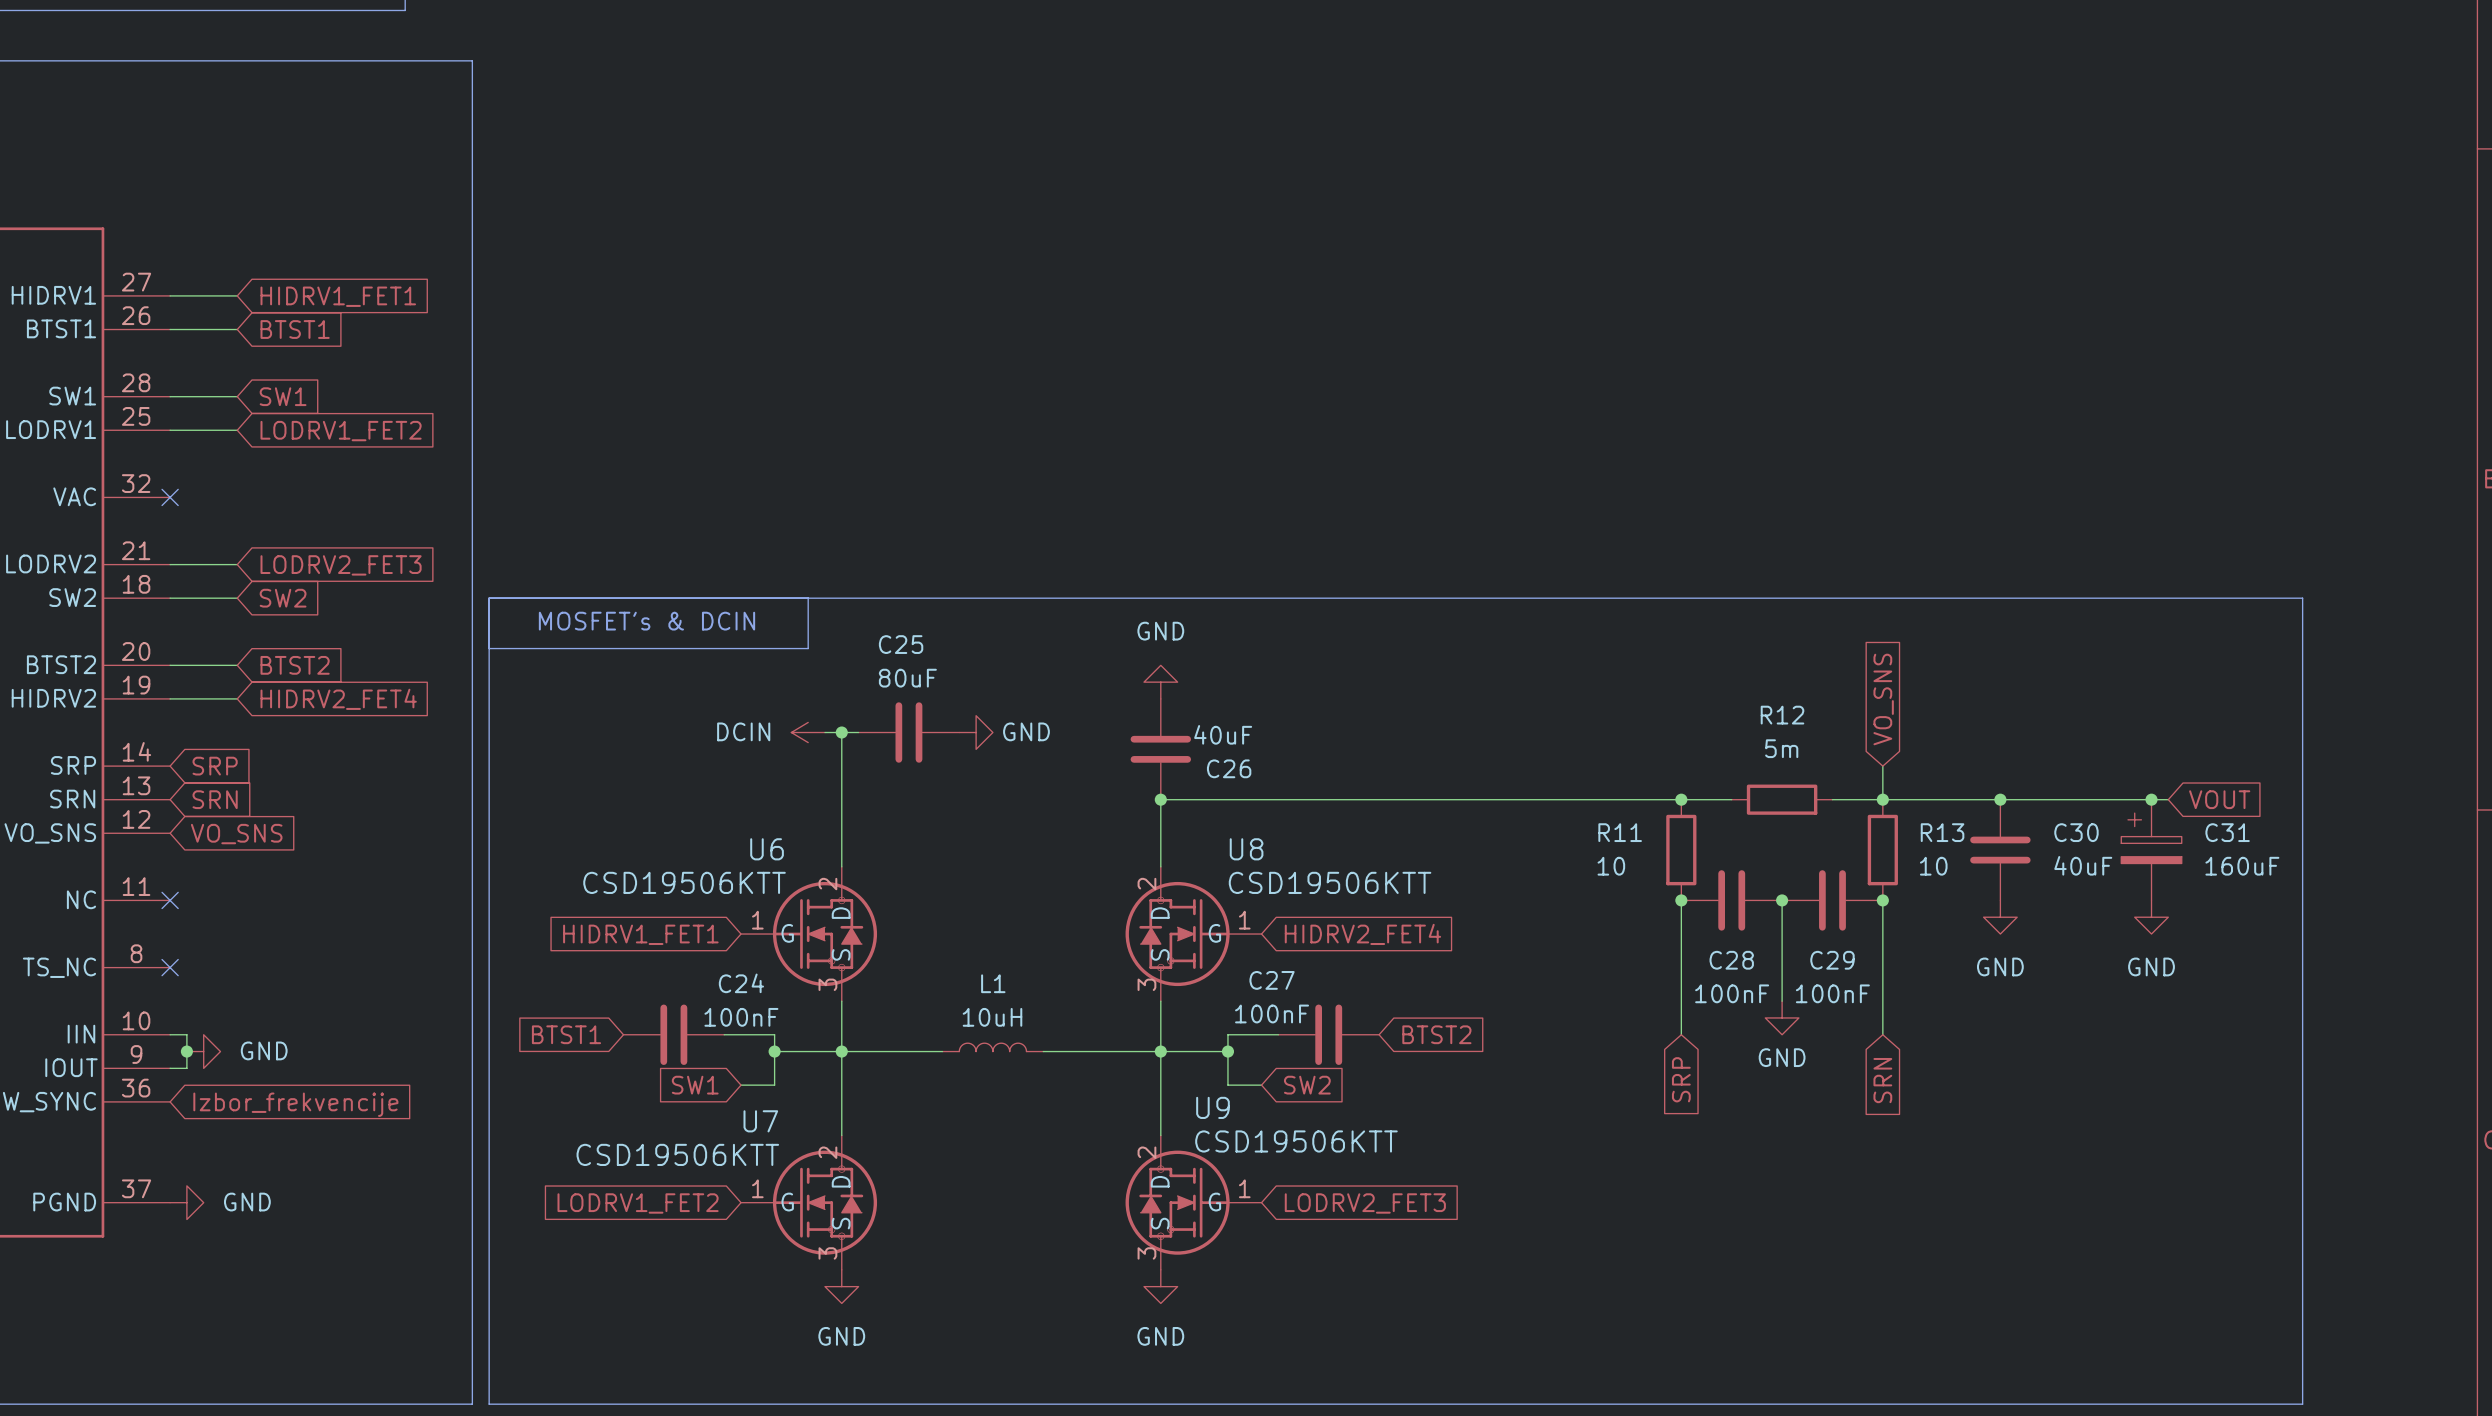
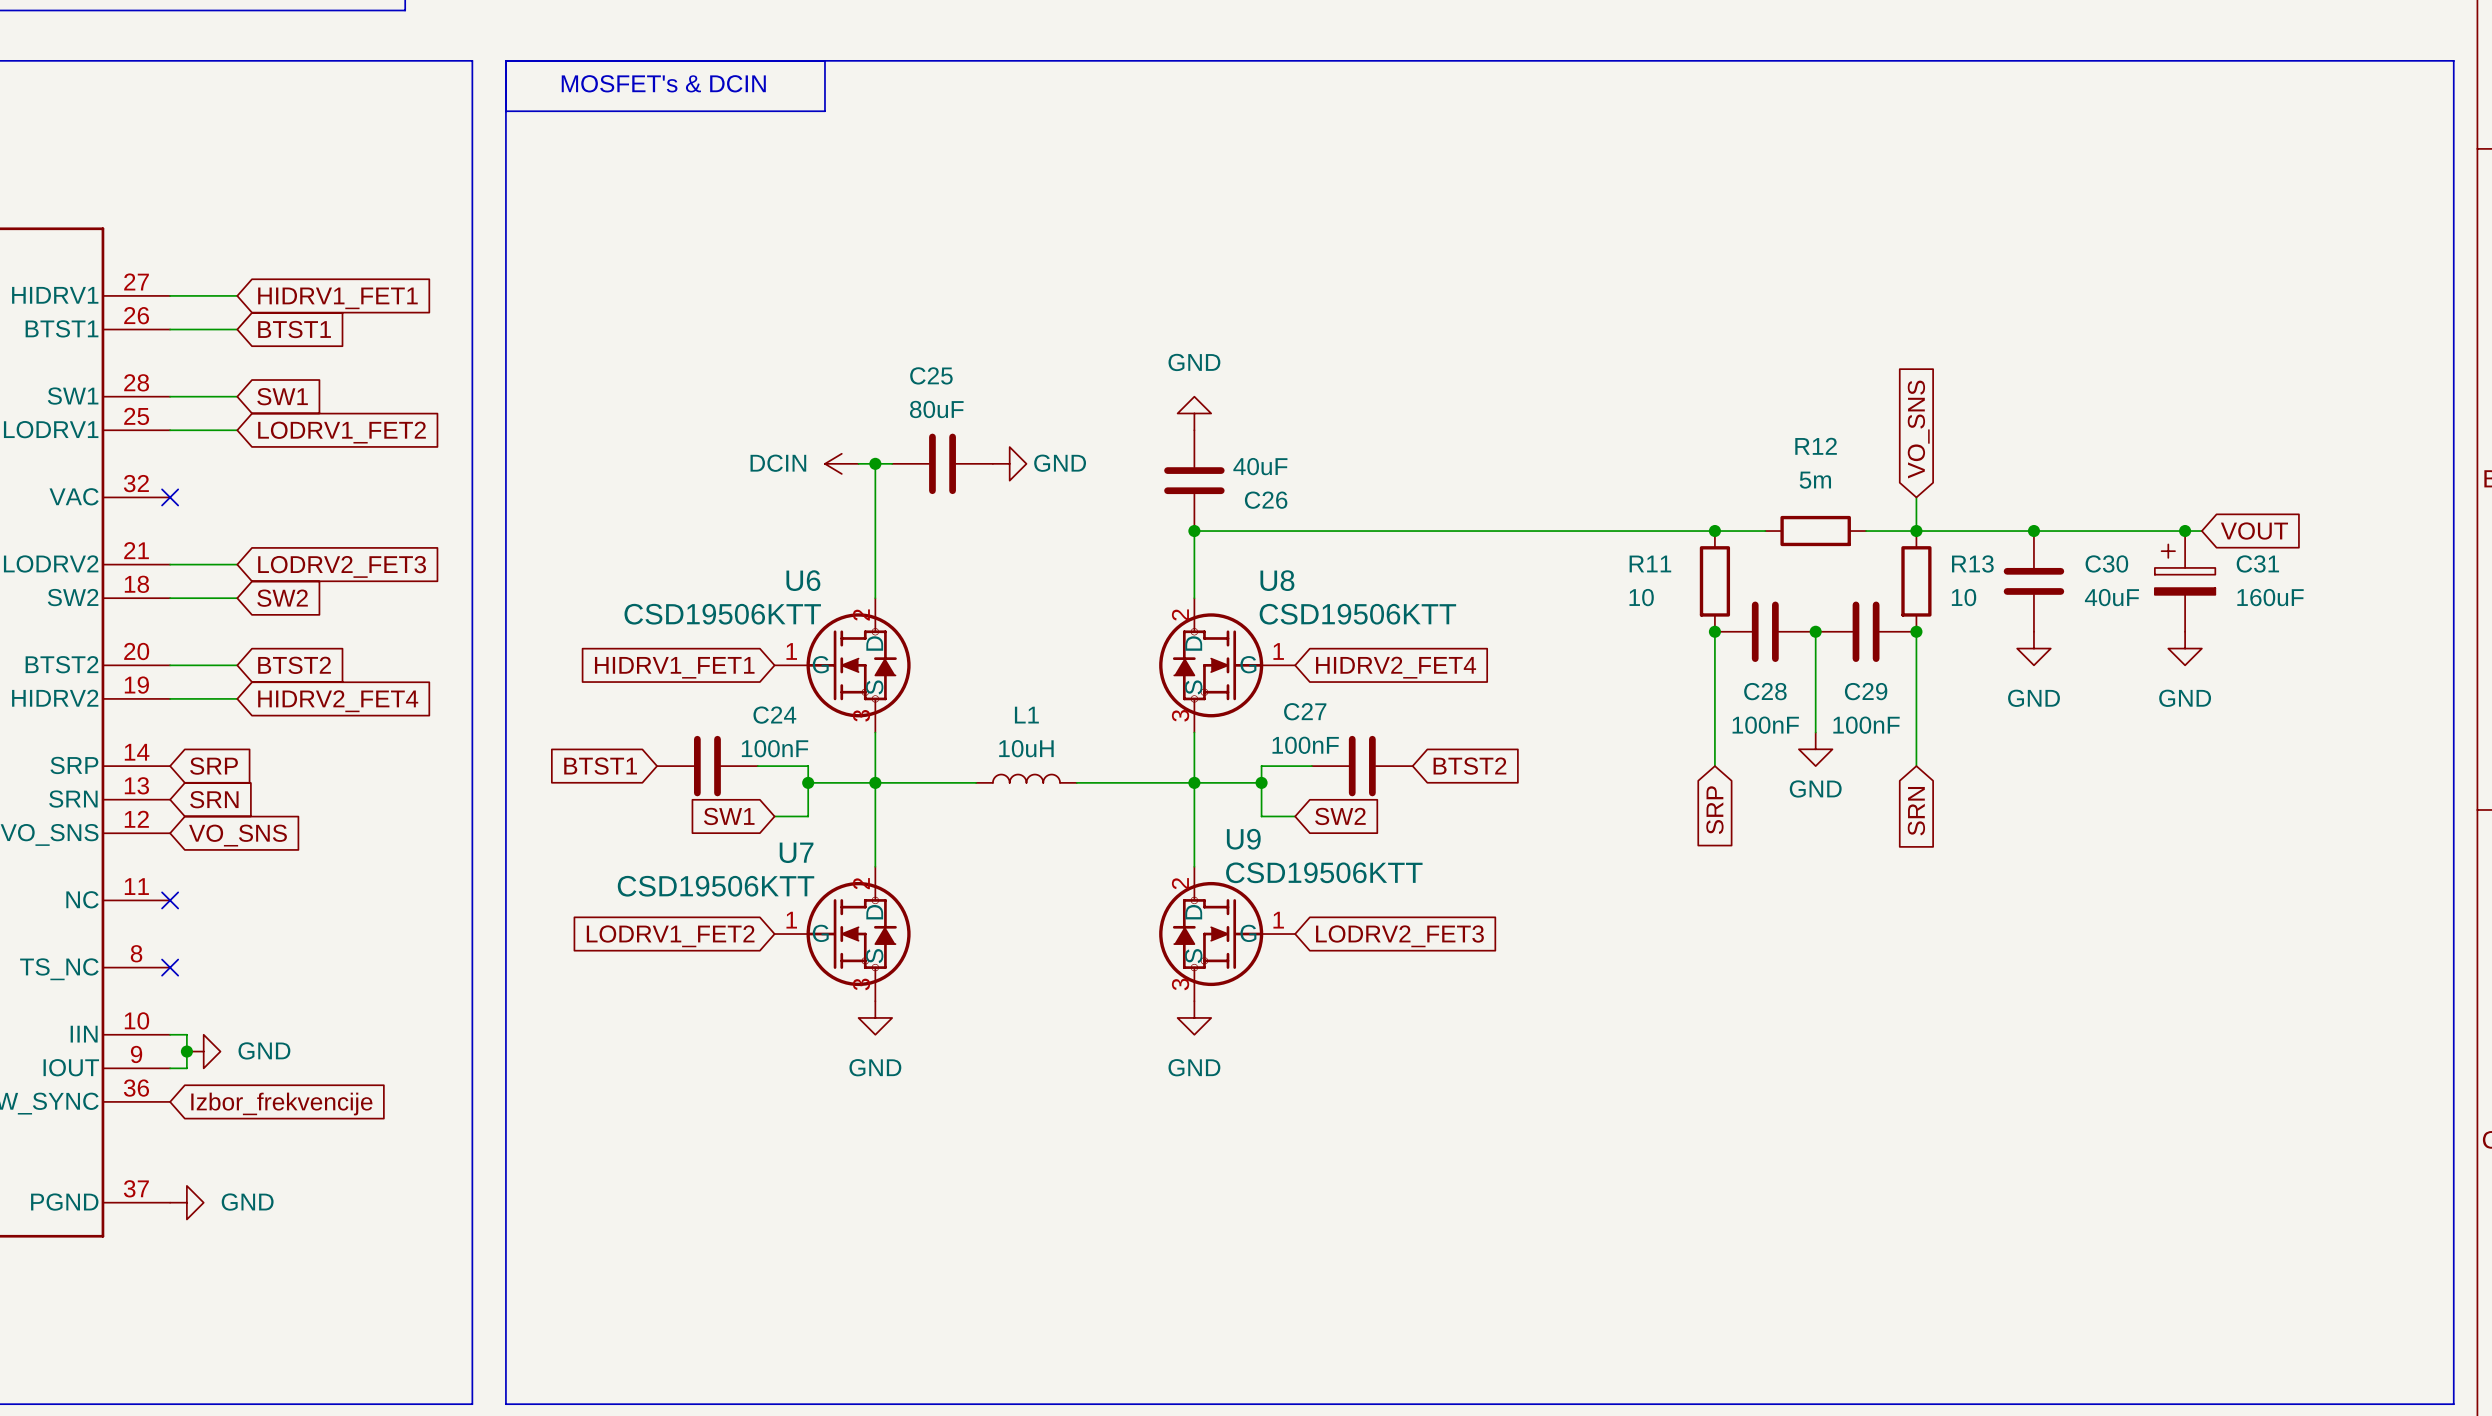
line: none -> (824, 60) (824, 111) (505, 111)
text: none -> MOSFET's & DCIN (663, 83)
power symbol: none -> GND (1194, 413)
junction: none -> (875, 463)
power symbol: none -> GND (1009, 463)
junction: none -> (1194, 531)
junction: none -> (1714, 531)
junction: none -> (1916, 531)
junction: none -> (2033, 531)
junction: none -> (2185, 531)
line: (808, 598) (808, 648) (489, 648) -> none
text: MOSFET's & DCIN (646, 621) -> none
junction: none -> (1714, 631)
junction: none -> (1815, 631)
junction: none -> (1916, 631)
power symbol: none -> GND (2033, 648)
power symbol: none -> GND (2185, 648)
power symbol: GND (1160, 682) -> none
global label position: VO_SNS (1883, 699) -> VO_SNS (1918, 429)
power symbol position: DCIN (808, 732) -> DCIN (841, 463)
wire: (824, 732) (858, 732) -> (858, 463) (892, 463)
wire: (841, 732) (841, 866) -> (875, 463) (875, 598)
junction: (841, 732) -> none
C25 position: (908, 732) -> (942, 463)
power symbol: GND (976, 732) -> none
C26 position: (1160, 749) -> (1194, 480)
power symbol: none -> GND (1815, 749)
wire: (1882, 766) (1882, 799) -> (1916, 497) (1916, 531)
junction: none -> (808, 782)
junction: none -> (875, 782)
junction: none -> (1261, 782)
junction position: (1160, 799) -> (1194, 782)
junction: (1681, 799) -> none
wire: (1731, 799) (1160, 799) (1160, 866) -> (1765, 531) (1194, 531) (1194, 598)
R12 position: (1782, 799) -> (1815, 531)
wire: (1832, 799) (2168, 799) -> (1866, 531) (2201, 531)
junction: (1882, 799) -> none
junction: (2000, 799) -> none
junction: (2151, 799) -> none
global label position: VOUT (2219, 799) -> VOUT (2254, 531)
R11 position: (1681, 850) -> (1714, 581)
R13 position: (1882, 850) -> (1916, 581)
C30 position: (2000, 850) -> (2033, 581)
C31 position: (2151, 850) -> (2185, 581)
wire: (1681, 900) (1681, 1034) -> (1714, 631) (1714, 766)
junction: (1681, 900) -> none
C28 position: (1731, 900) -> (1765, 631)
wire: (1782, 900) (1782, 1001) -> (1815, 631) (1815, 732)
junction: (1782, 900) -> none
C29 position: (1832, 900) -> (1866, 631)
wire: (1882, 900) (1882, 1034) -> (1916, 631) (1916, 766)
junction: (1882, 900) -> none
power symbol: GND (2000, 917) -> none
power symbol: GND (2151, 917) -> none
global label position: HIDRV1_FET1 (640, 934) -> HIDRV1_FET1 (674, 667)
U6 position: (809, 934) -> (842, 665)
U8 position: (1193, 934) -> (1227, 665)
global label position: HIDRV2_FET4 (1362, 934) -> HIDRV2_FET4 (1396, 667)
wire: (841, 1001) (841, 1135) -> (875, 732) (875, 866)
wire: (1160, 1001) (1160, 1135) -> (1194, 732) (1194, 866)
power symbol: none -> GND (875, 1017)
power symbol: none -> GND (1194, 1017)
power symbol: GND (1782, 1017) -> none
global label position: BTST1 (566, 1034) -> BTST1 (600, 766)
C24 position: (673, 1034) -> (707, 766)
wire: (724, 1034) (774, 1034) (774, 1085) (741, 1085) -> (757, 766) (808, 766) (808, 816) (774, 816)
wire: (1278, 1034) (1227, 1034) (1227, 1085) (1261, 1085) -> (1311, 766) (1261, 766) (1261, 816) (1295, 816)
C27 position: (1328, 1034) -> (1362, 766)
global label position: BTST2 (1436, 1034) -> BTST2 (1469, 766)
L1 position: (992, 1047) -> (1026, 778)
wire: (774, 1051) (942, 1051) -> (808, 782) (976, 782)
junction: (774, 1051) -> none
junction: (841, 1051) -> none
wire: (1043, 1051) (1227, 1051) -> (1076, 782) (1261, 782)
junction: (1160, 1051) -> none
junction: (1227, 1051) -> none
global label position: SRP (1681, 1079) -> SRP (1714, 810)
global label position: SRN (1882, 1080) -> SRN (1916, 811)
global label position: SW1 (695, 1085) -> SW1 (729, 816)
global label position: SW2 (1307, 1085) -> SW2 (1340, 816)
U7 position: (809, 1202) -> (842, 934)
U9 position: (1193, 1202) -> (1227, 934)
global label position: LODRV1_FET2 (638, 1203) -> LODRV1_FET2 (670, 936)
global label position: LODRV2_FET3 (1365, 1203) -> LODRV2_FET3 (1399, 936)
power symbol: GND (841, 1286) -> none
power symbol: GND (1160, 1286) -> none
line: (505, 1404) (489, 1404) (489, 598) (2302, 598) (2302, 1404) -> (505, 1404) (505, 60) (2453, 60) (2453, 1404) (2302, 1404)

